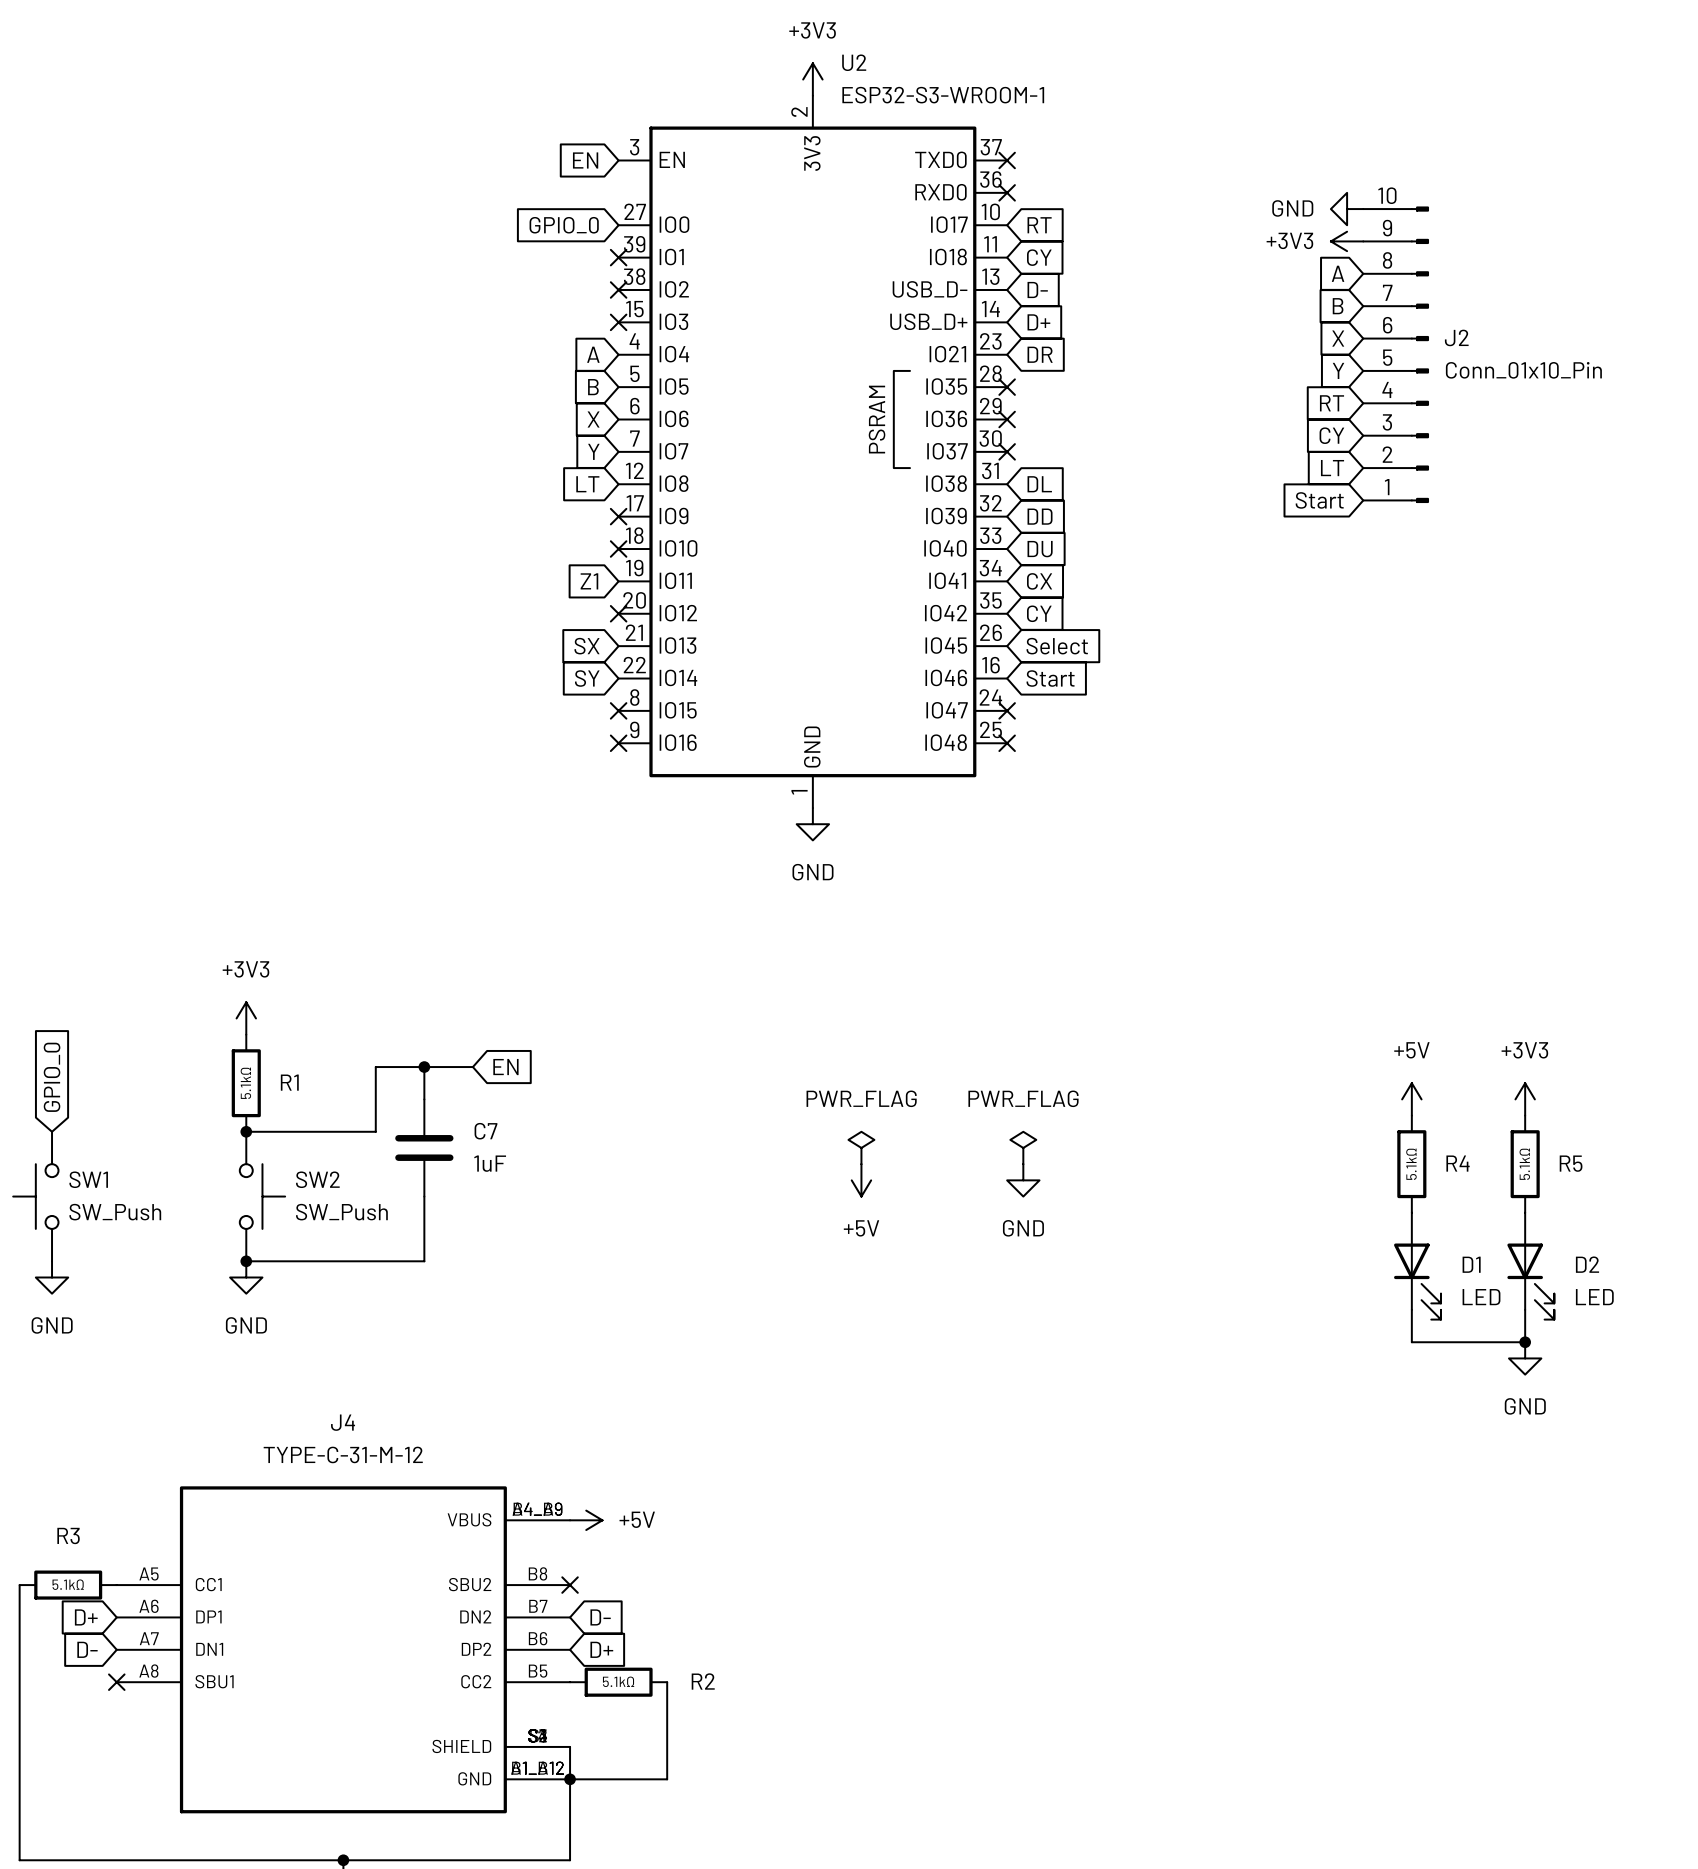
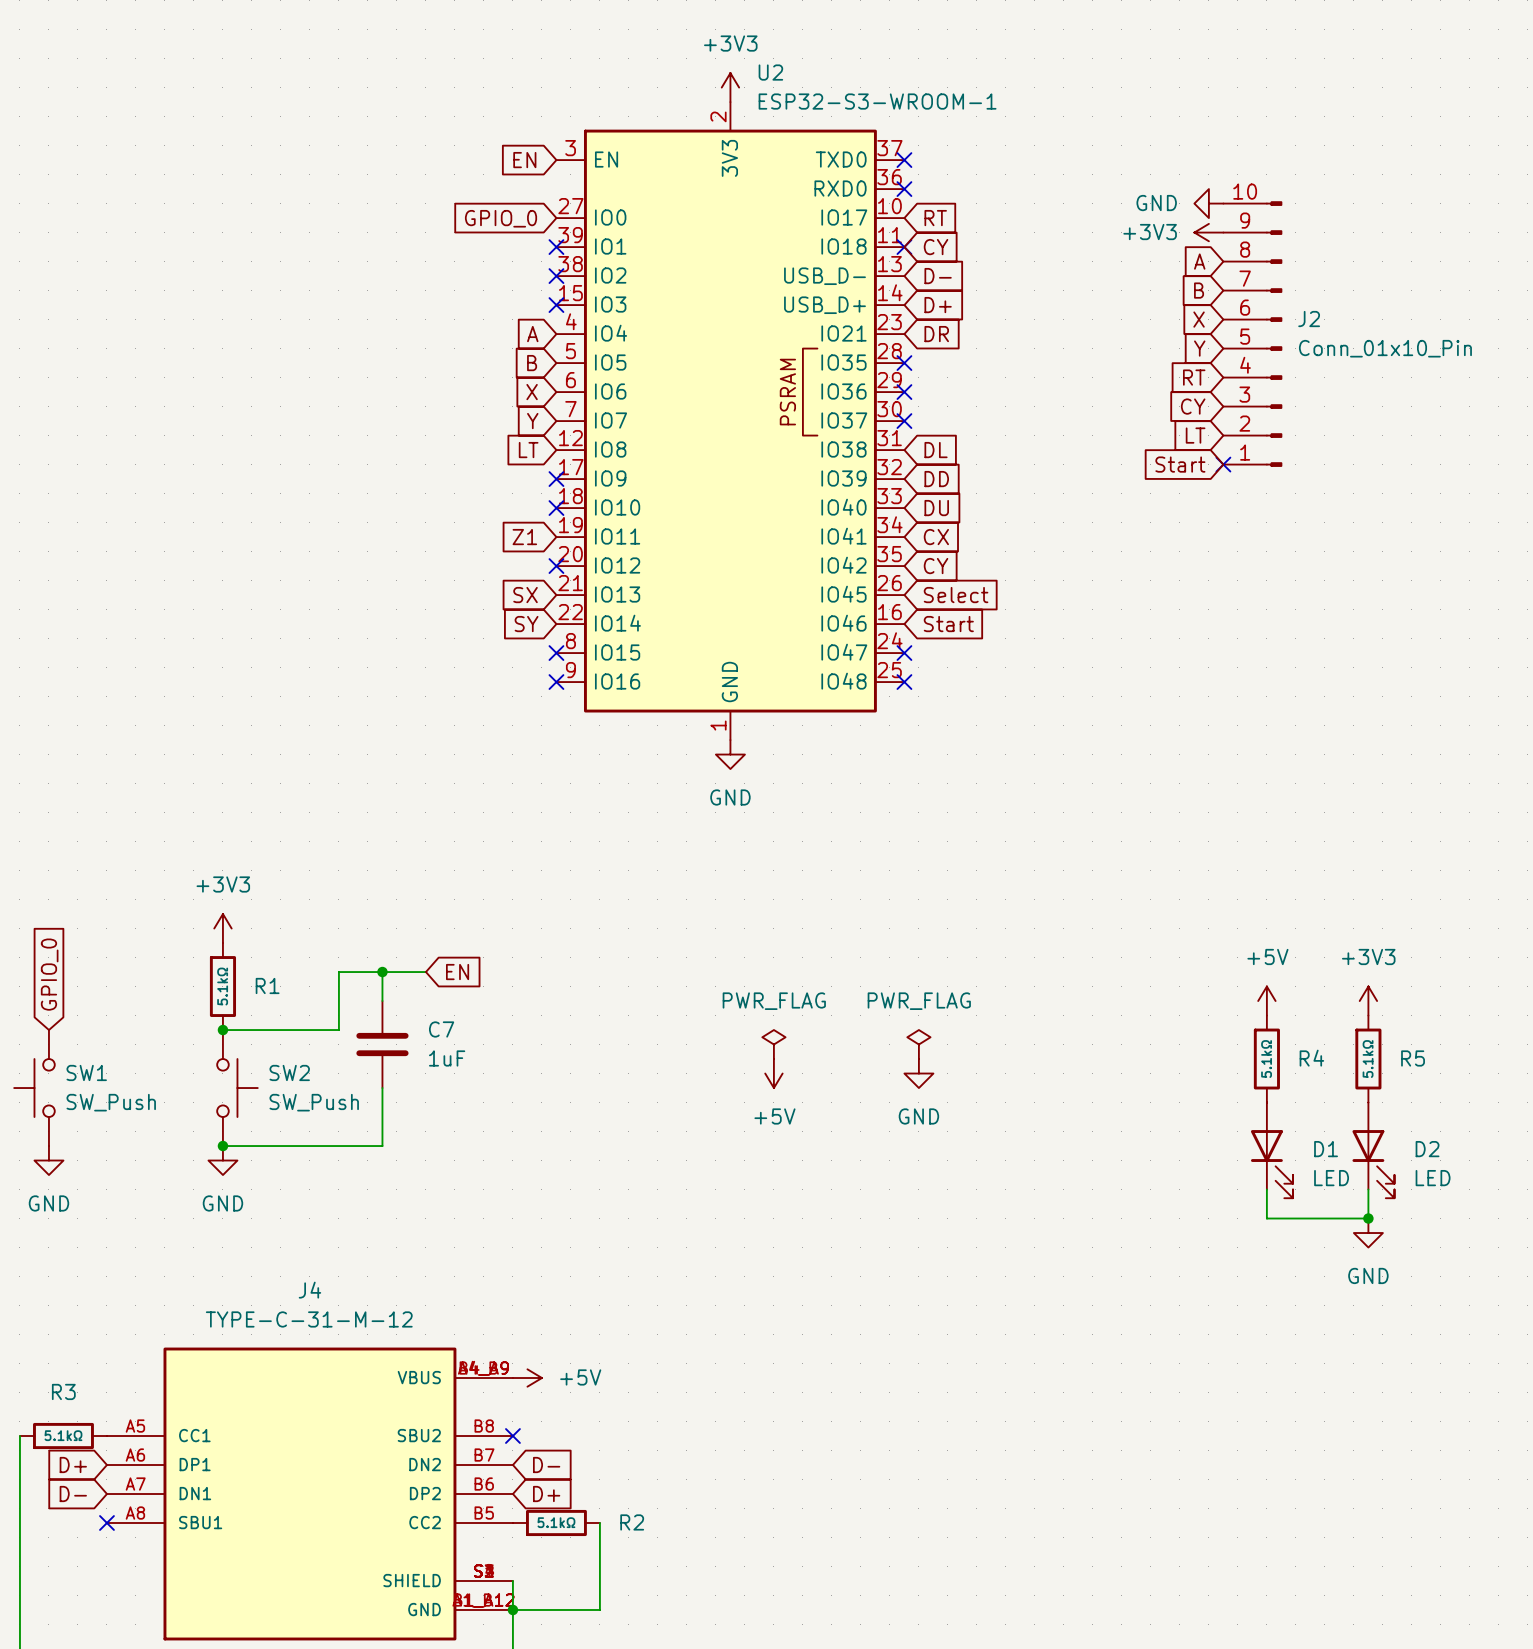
no-connect mark: none -> (904, 247)
no-connect mark: none -> (1223, 464)

